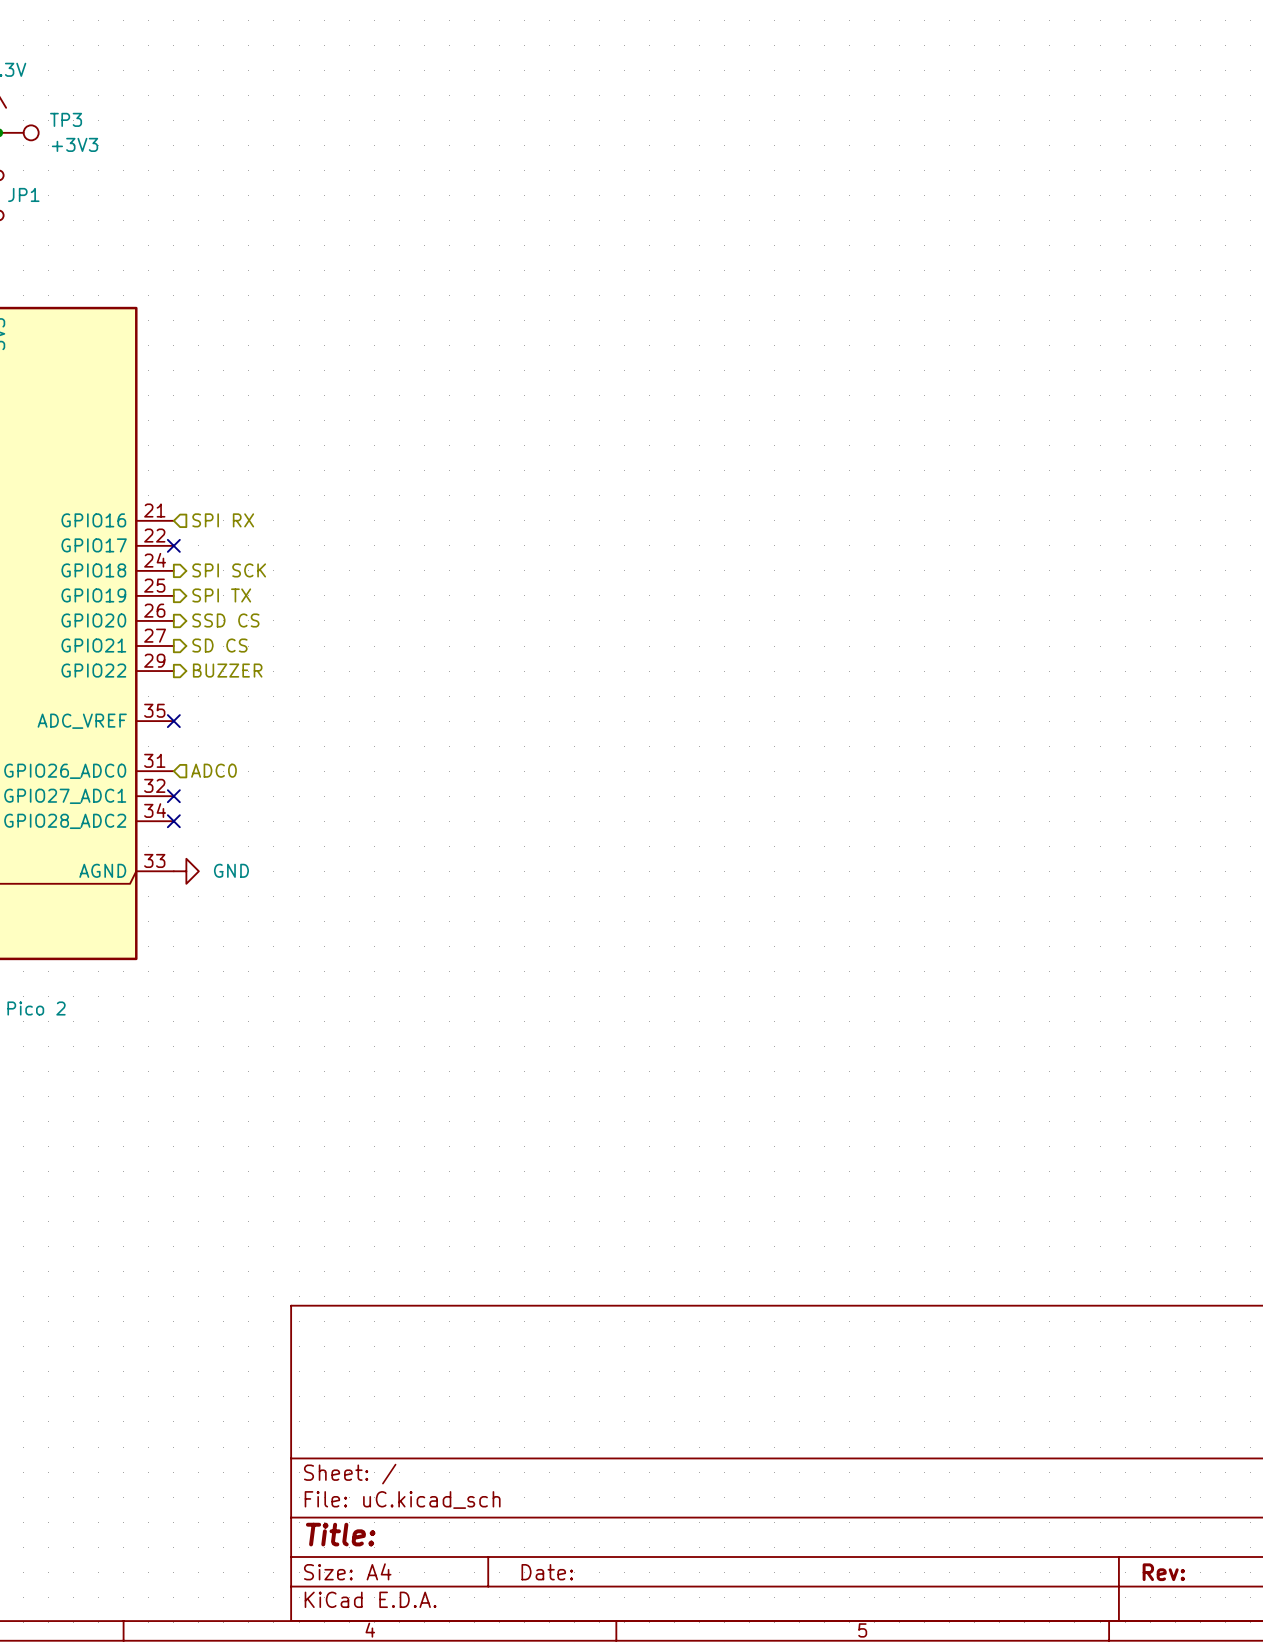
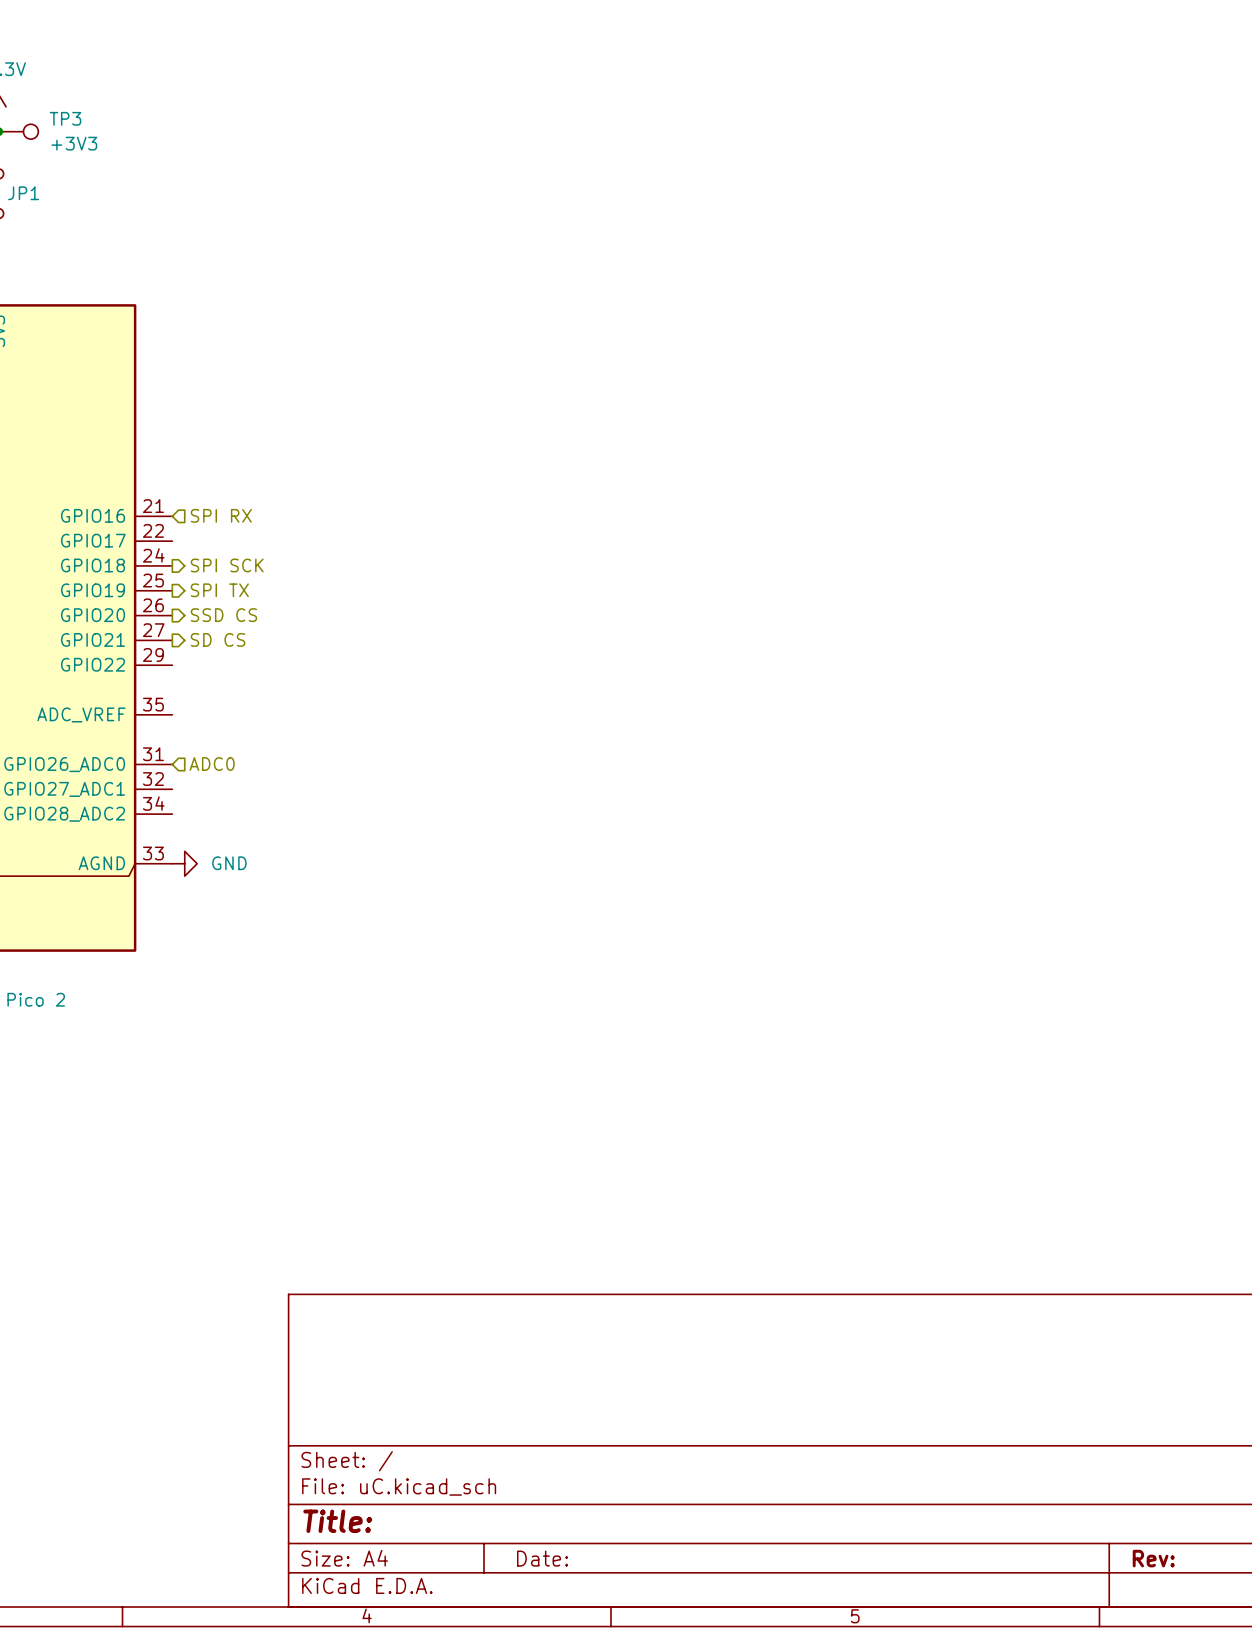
no-connect mark: (173, 545) -> none
hierarchical label: BUZZER (227, 670) -> none
no-connect mark: (173, 721) -> none
no-connect mark: (173, 796) -> none
no-connect mark: (173, 821) -> none

